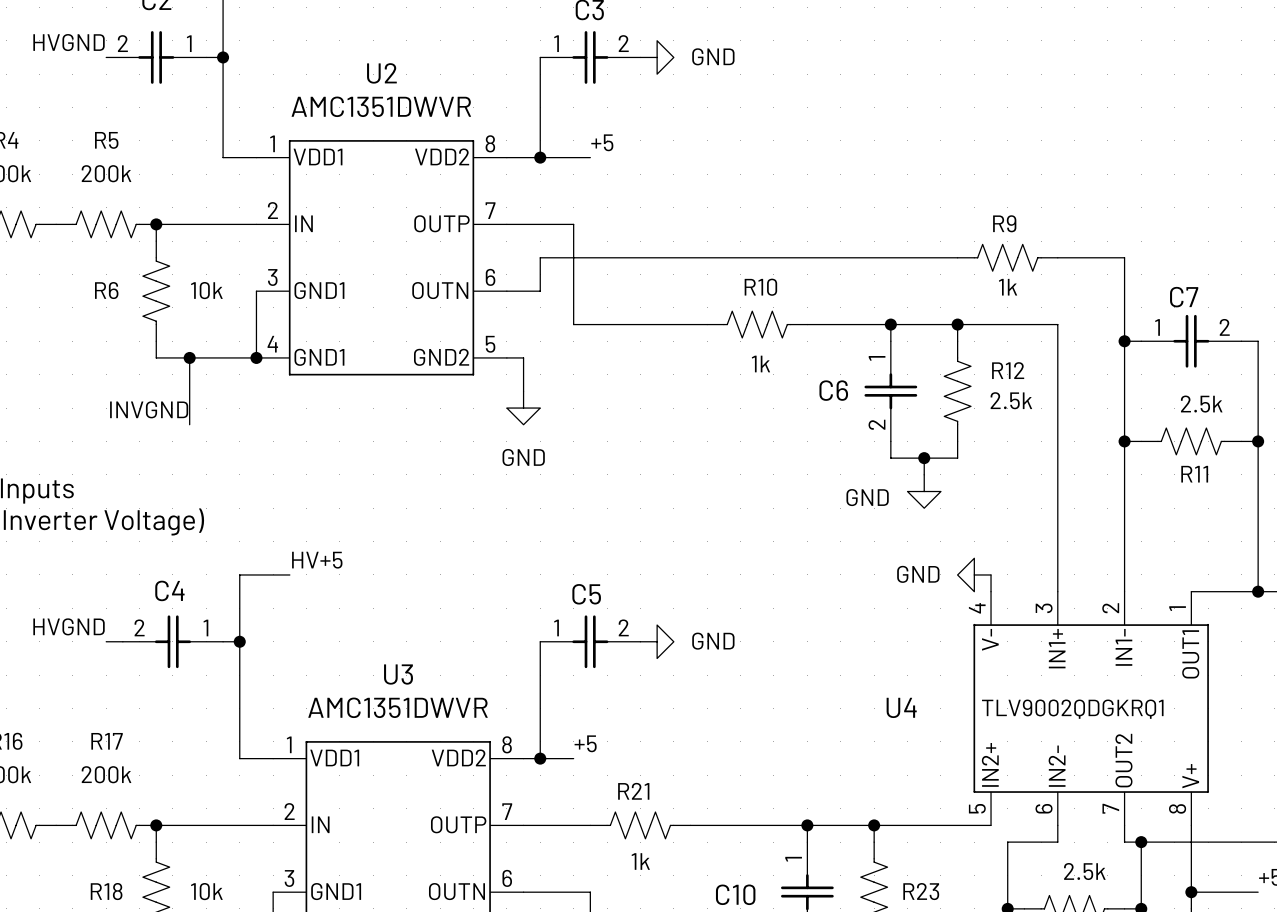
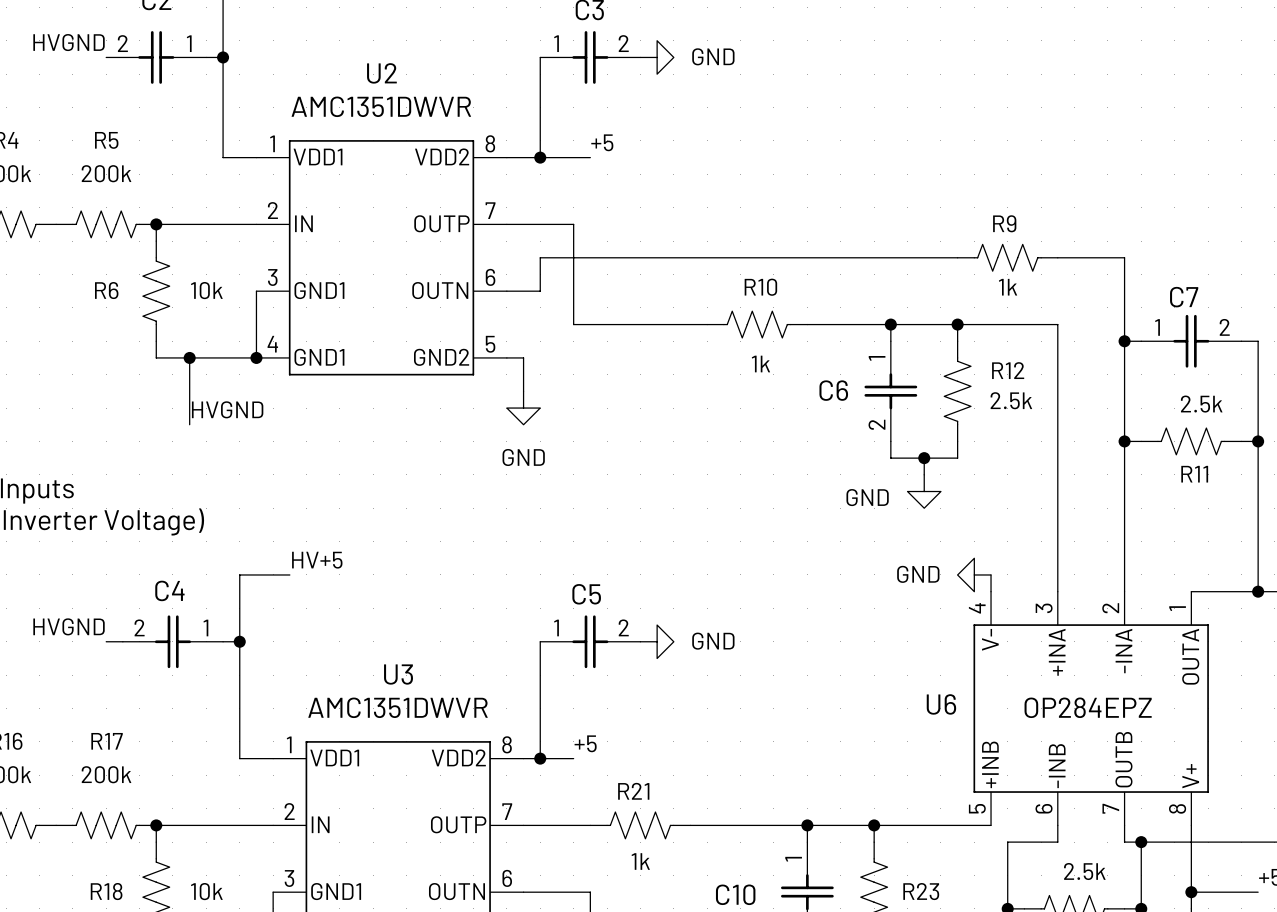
label: INVGND (149, 409) -> HVGND (227, 409)
U4: TLV9002QDGKRQ1 (1091, 708) -> none
U6: none -> OP284EPZ (1091, 708)

